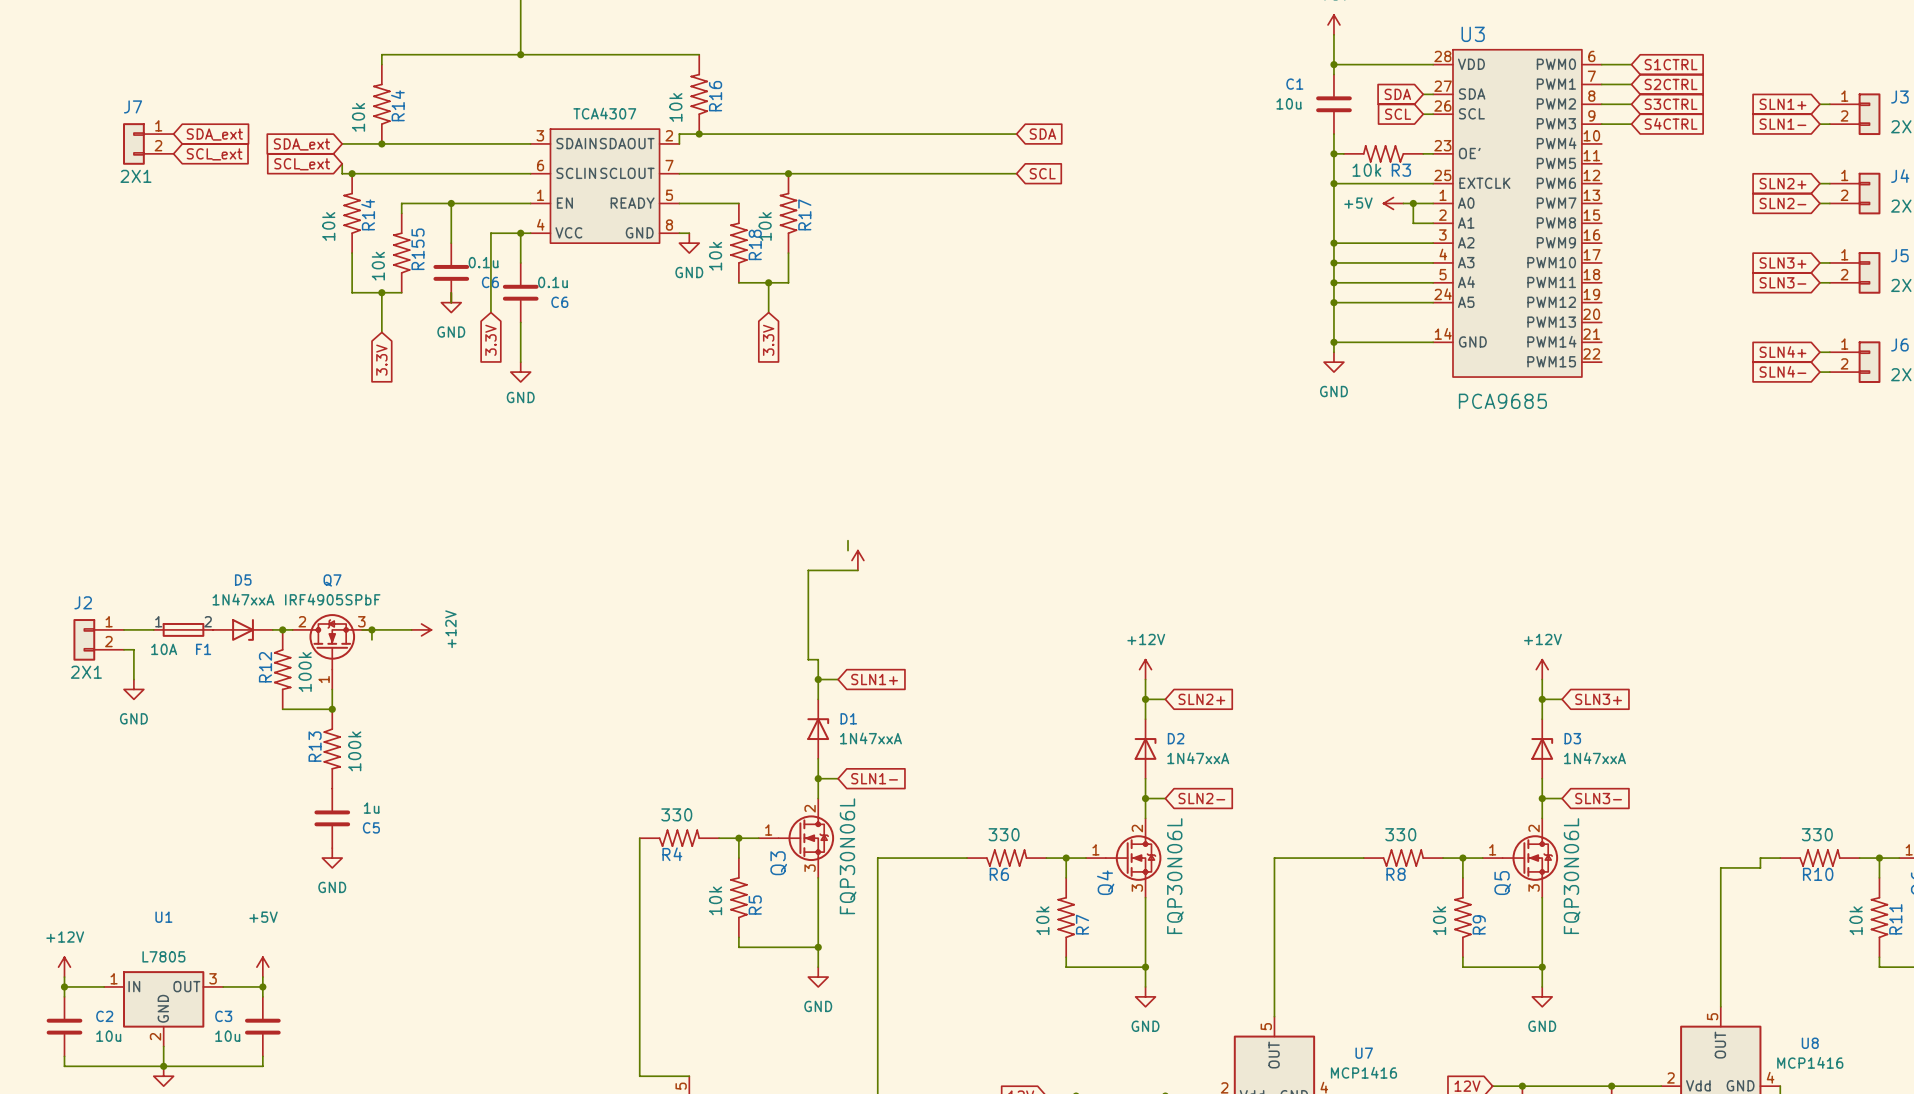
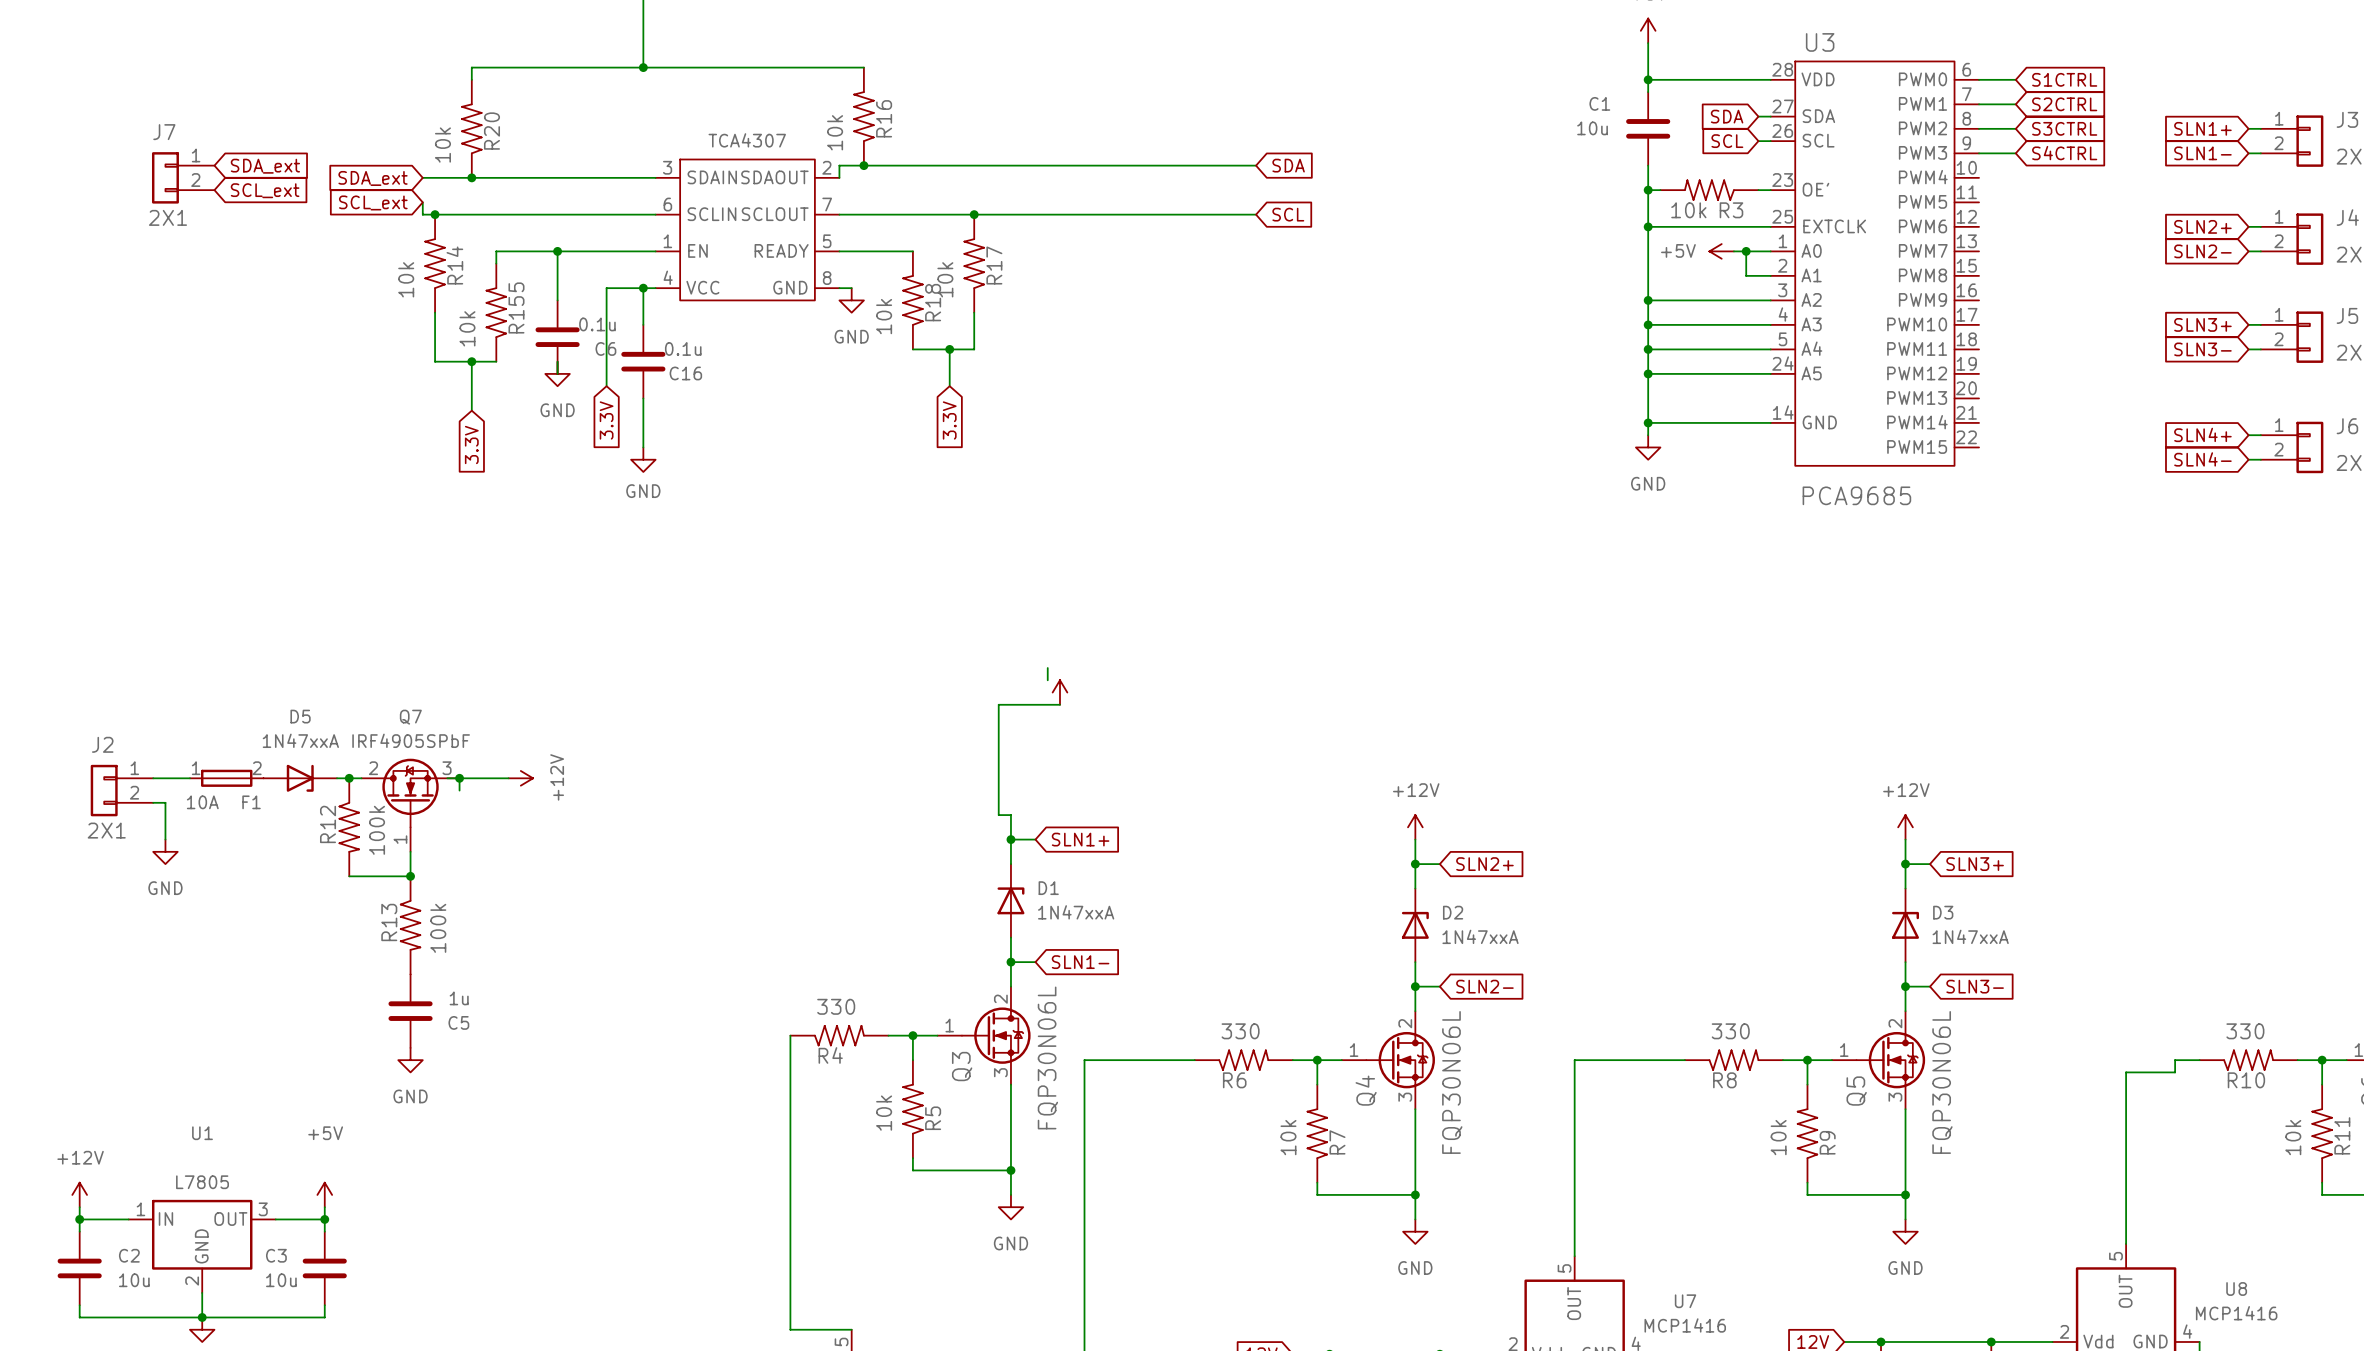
R14 name: R14 (397, 105) -> R20 (491, 131)
C6 name: C6 (559, 302) -> C16 (685, 373)

